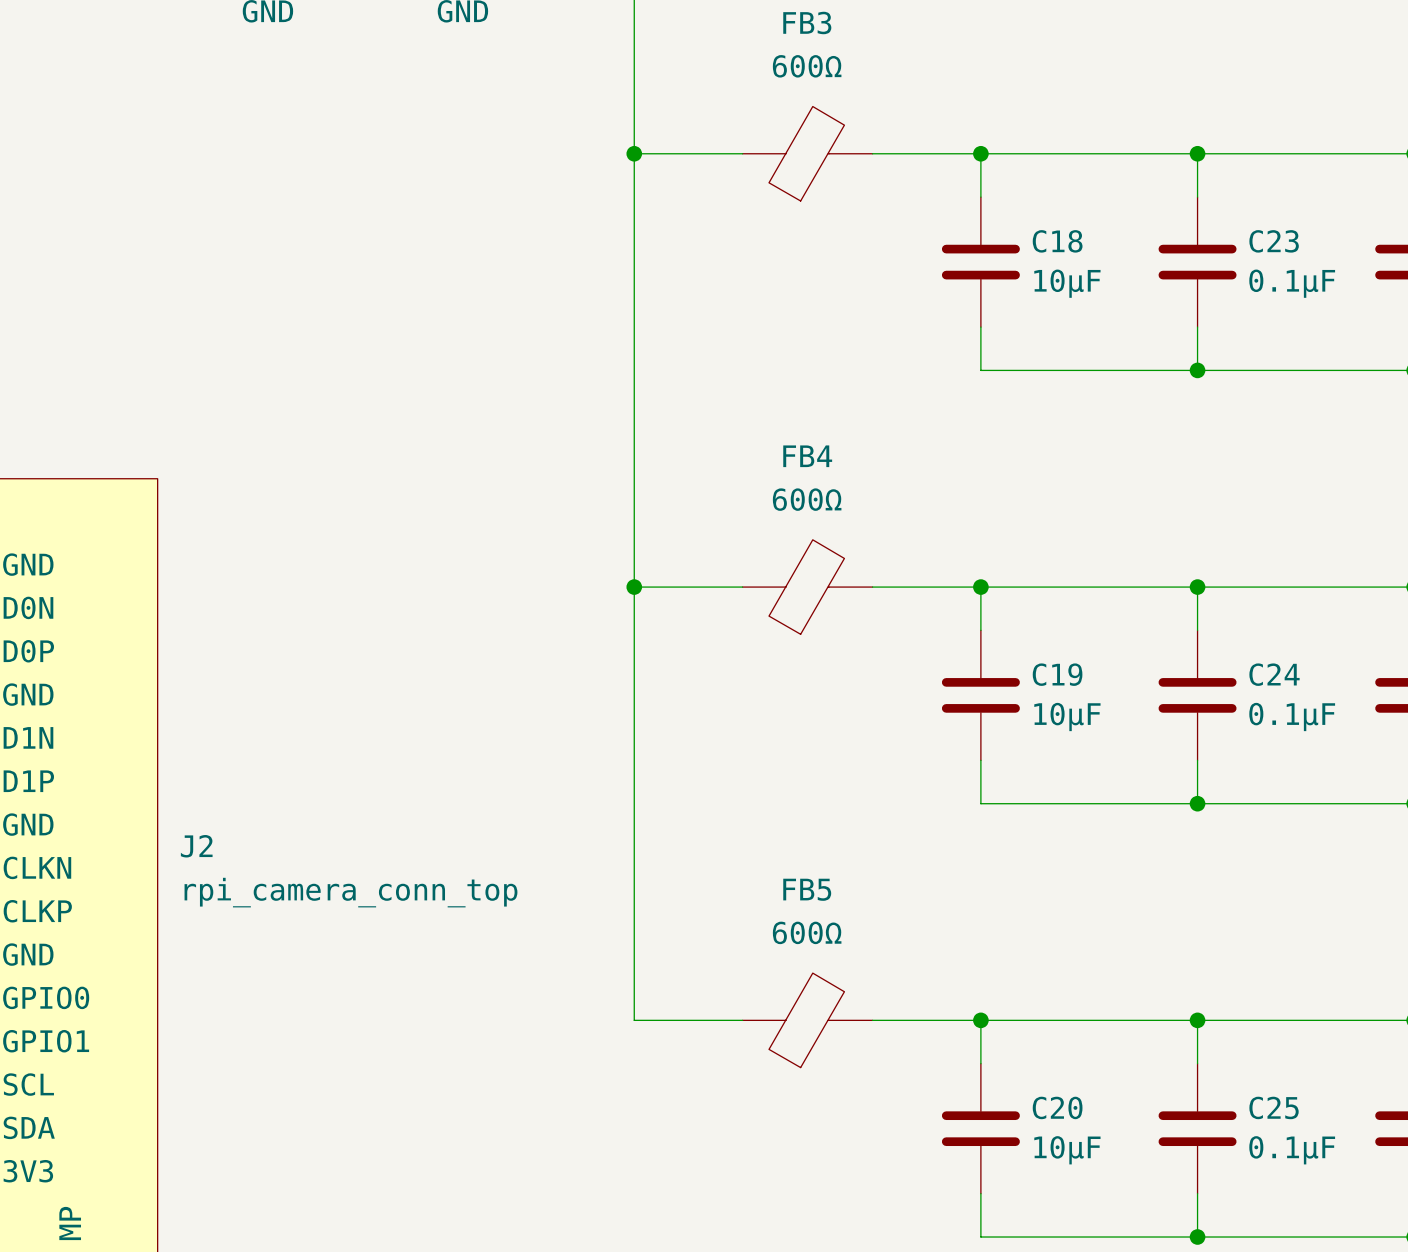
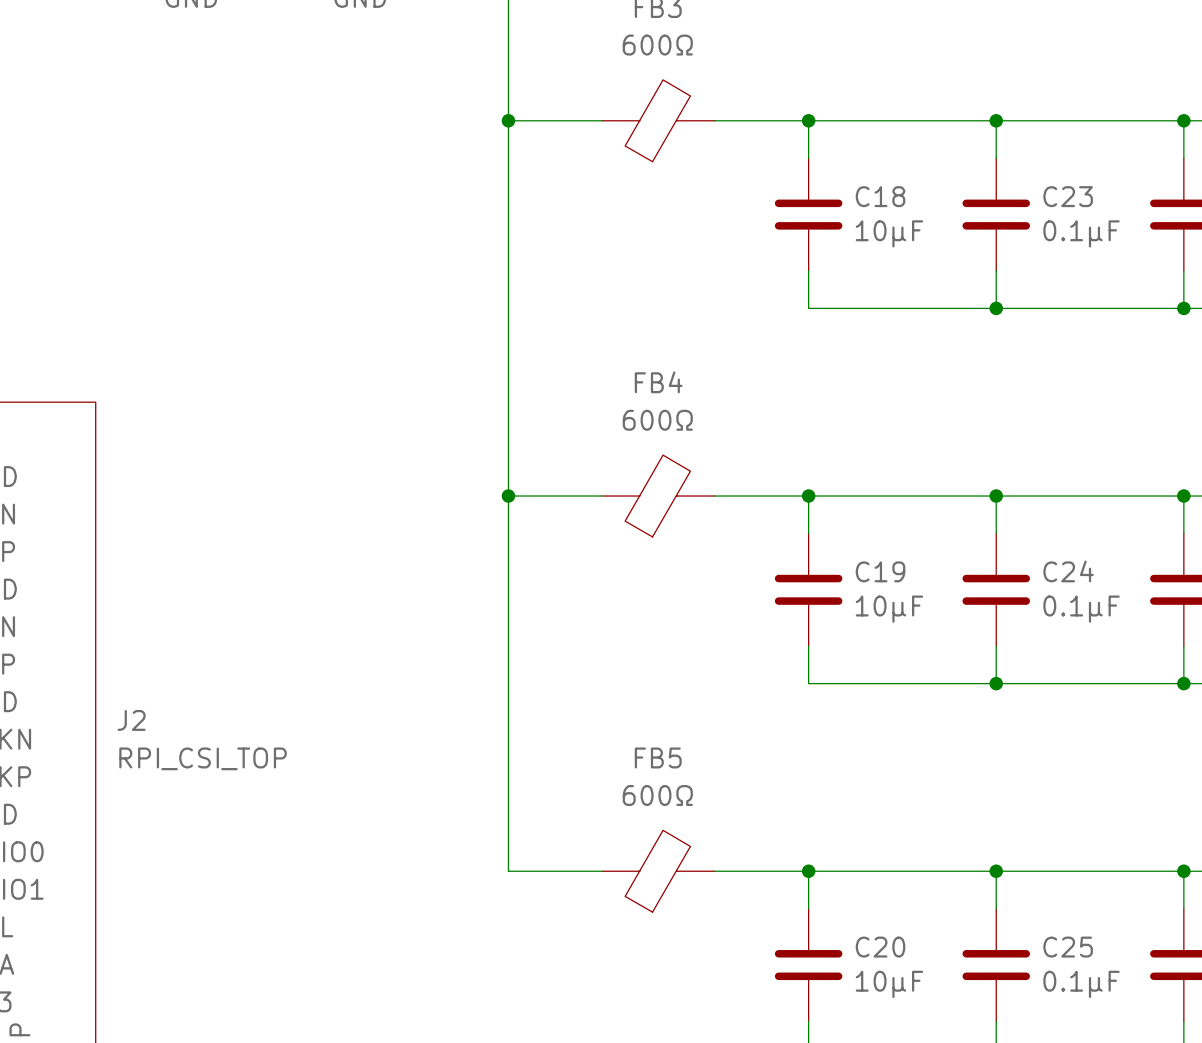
J2 value: rpi_camera_conn_top (350, 892) -> RPI_CSI_TOP (203, 758)

